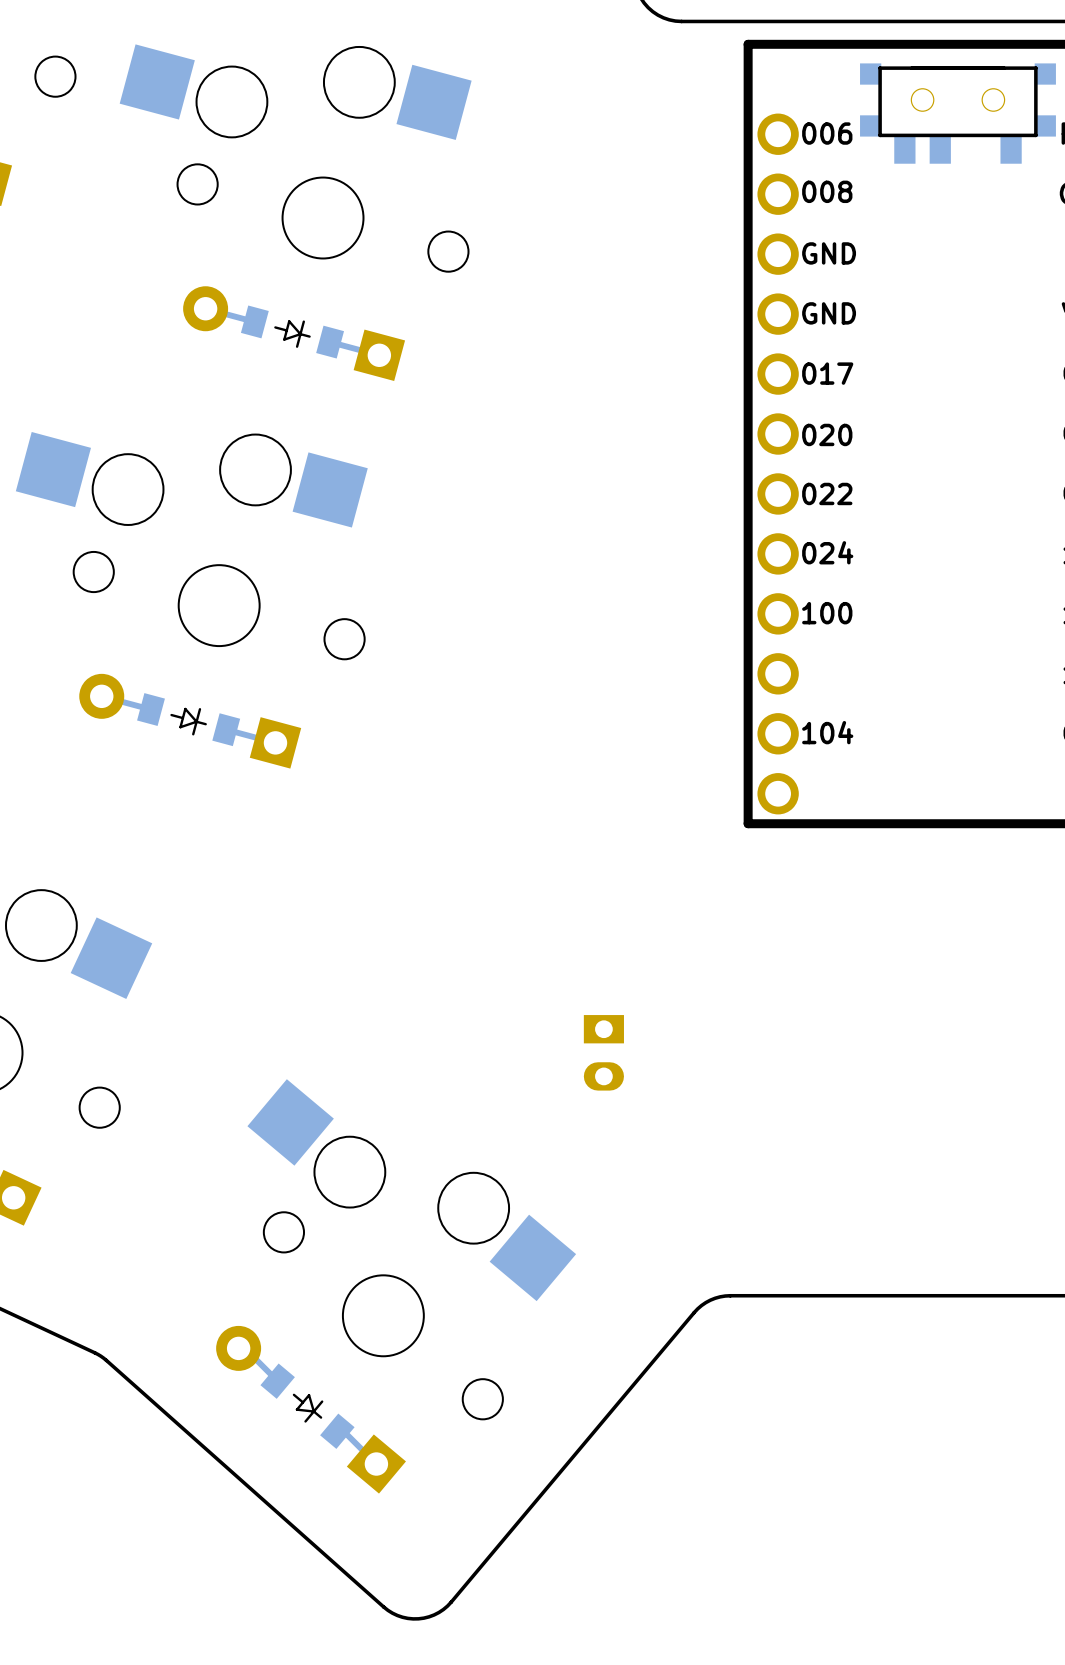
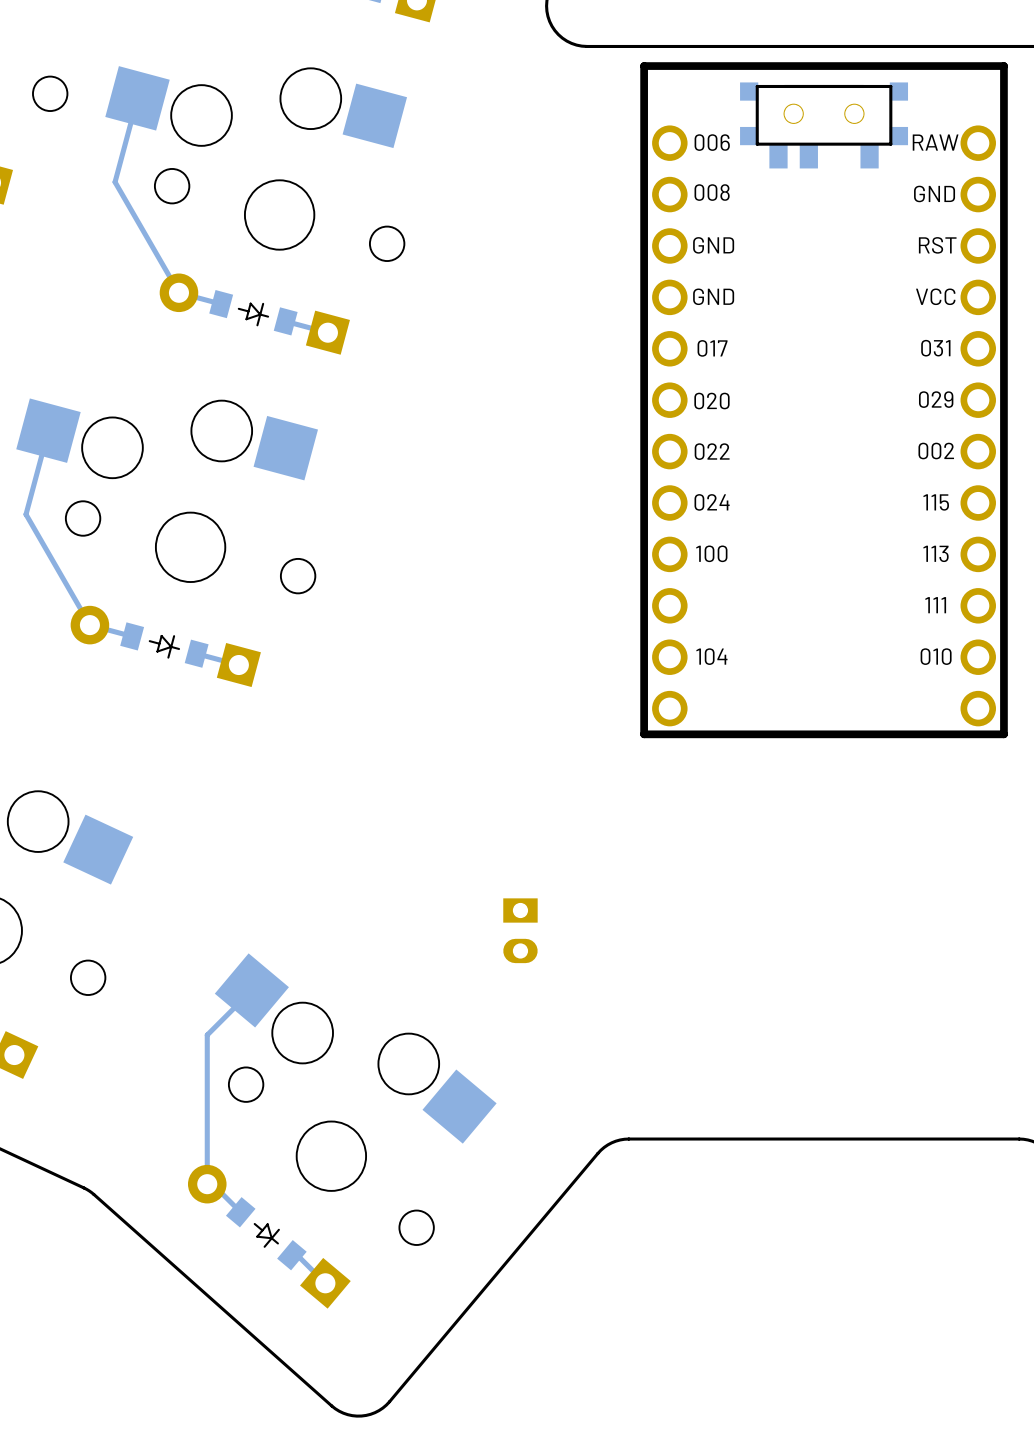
track: none -> (137, 98) (115, 182) (178, 292)
track: none -> (48, 430) (26, 514) (89, 625)
track: none -> (251, 990) (207, 1035) (207, 1184)

